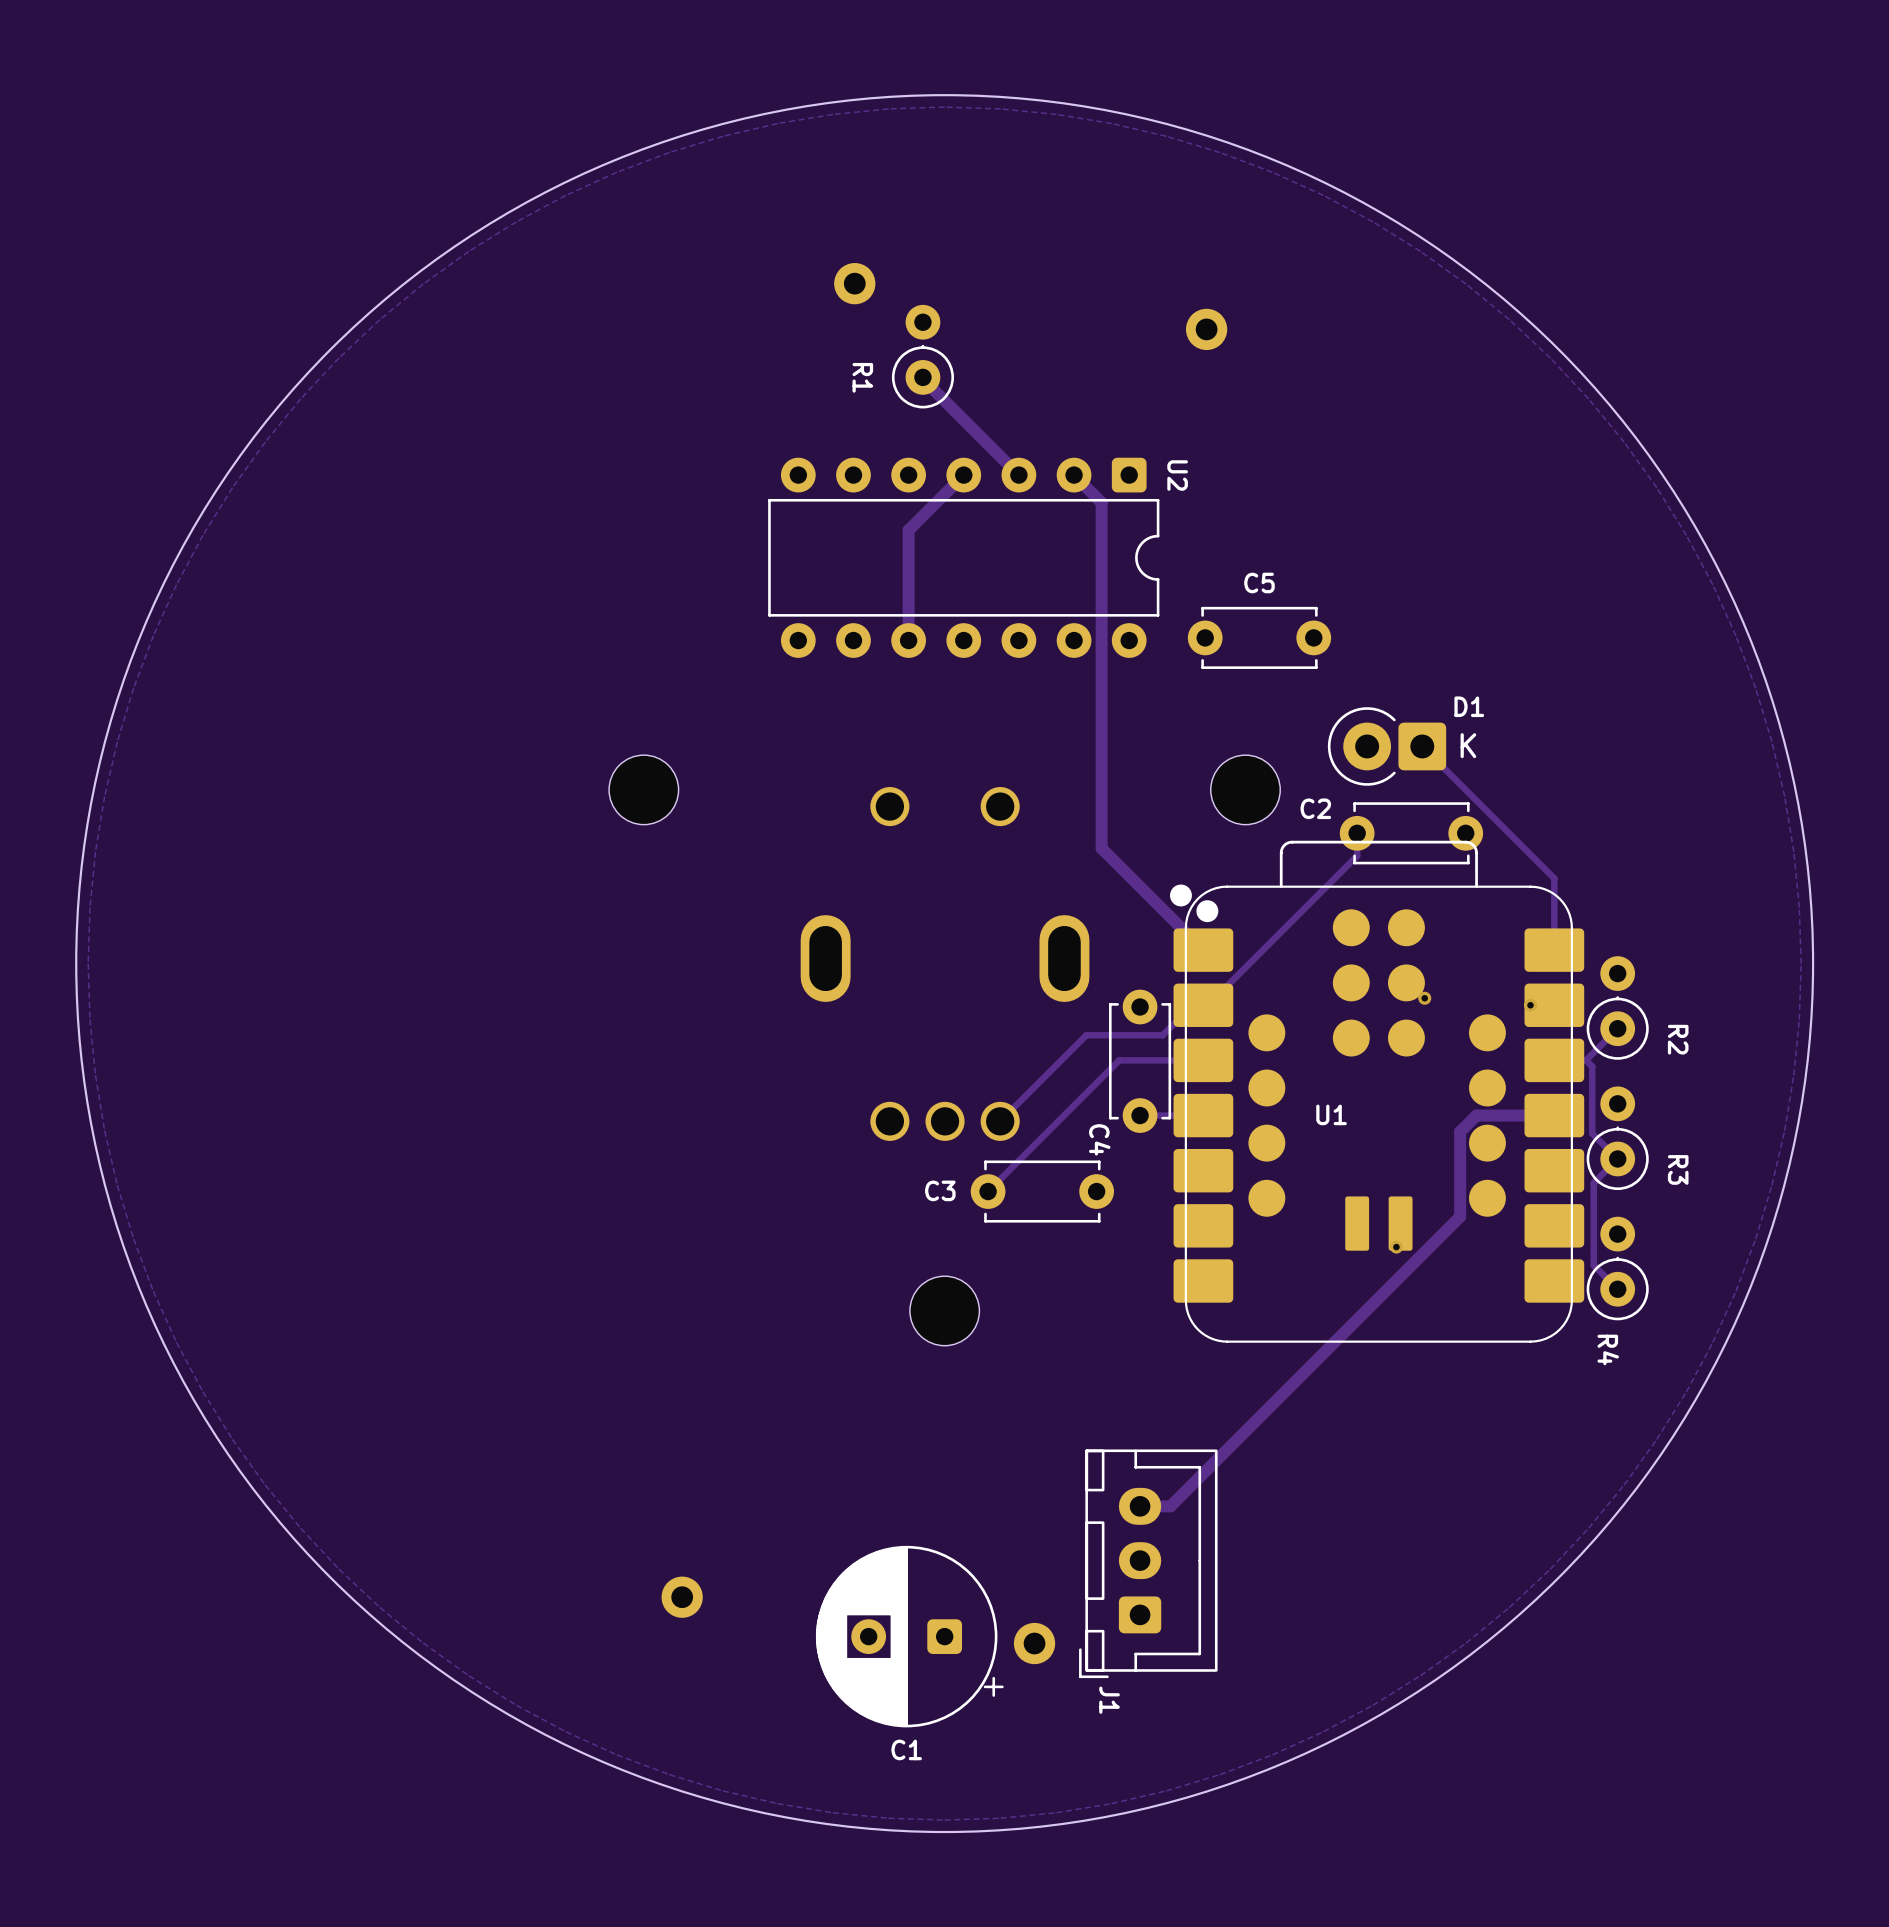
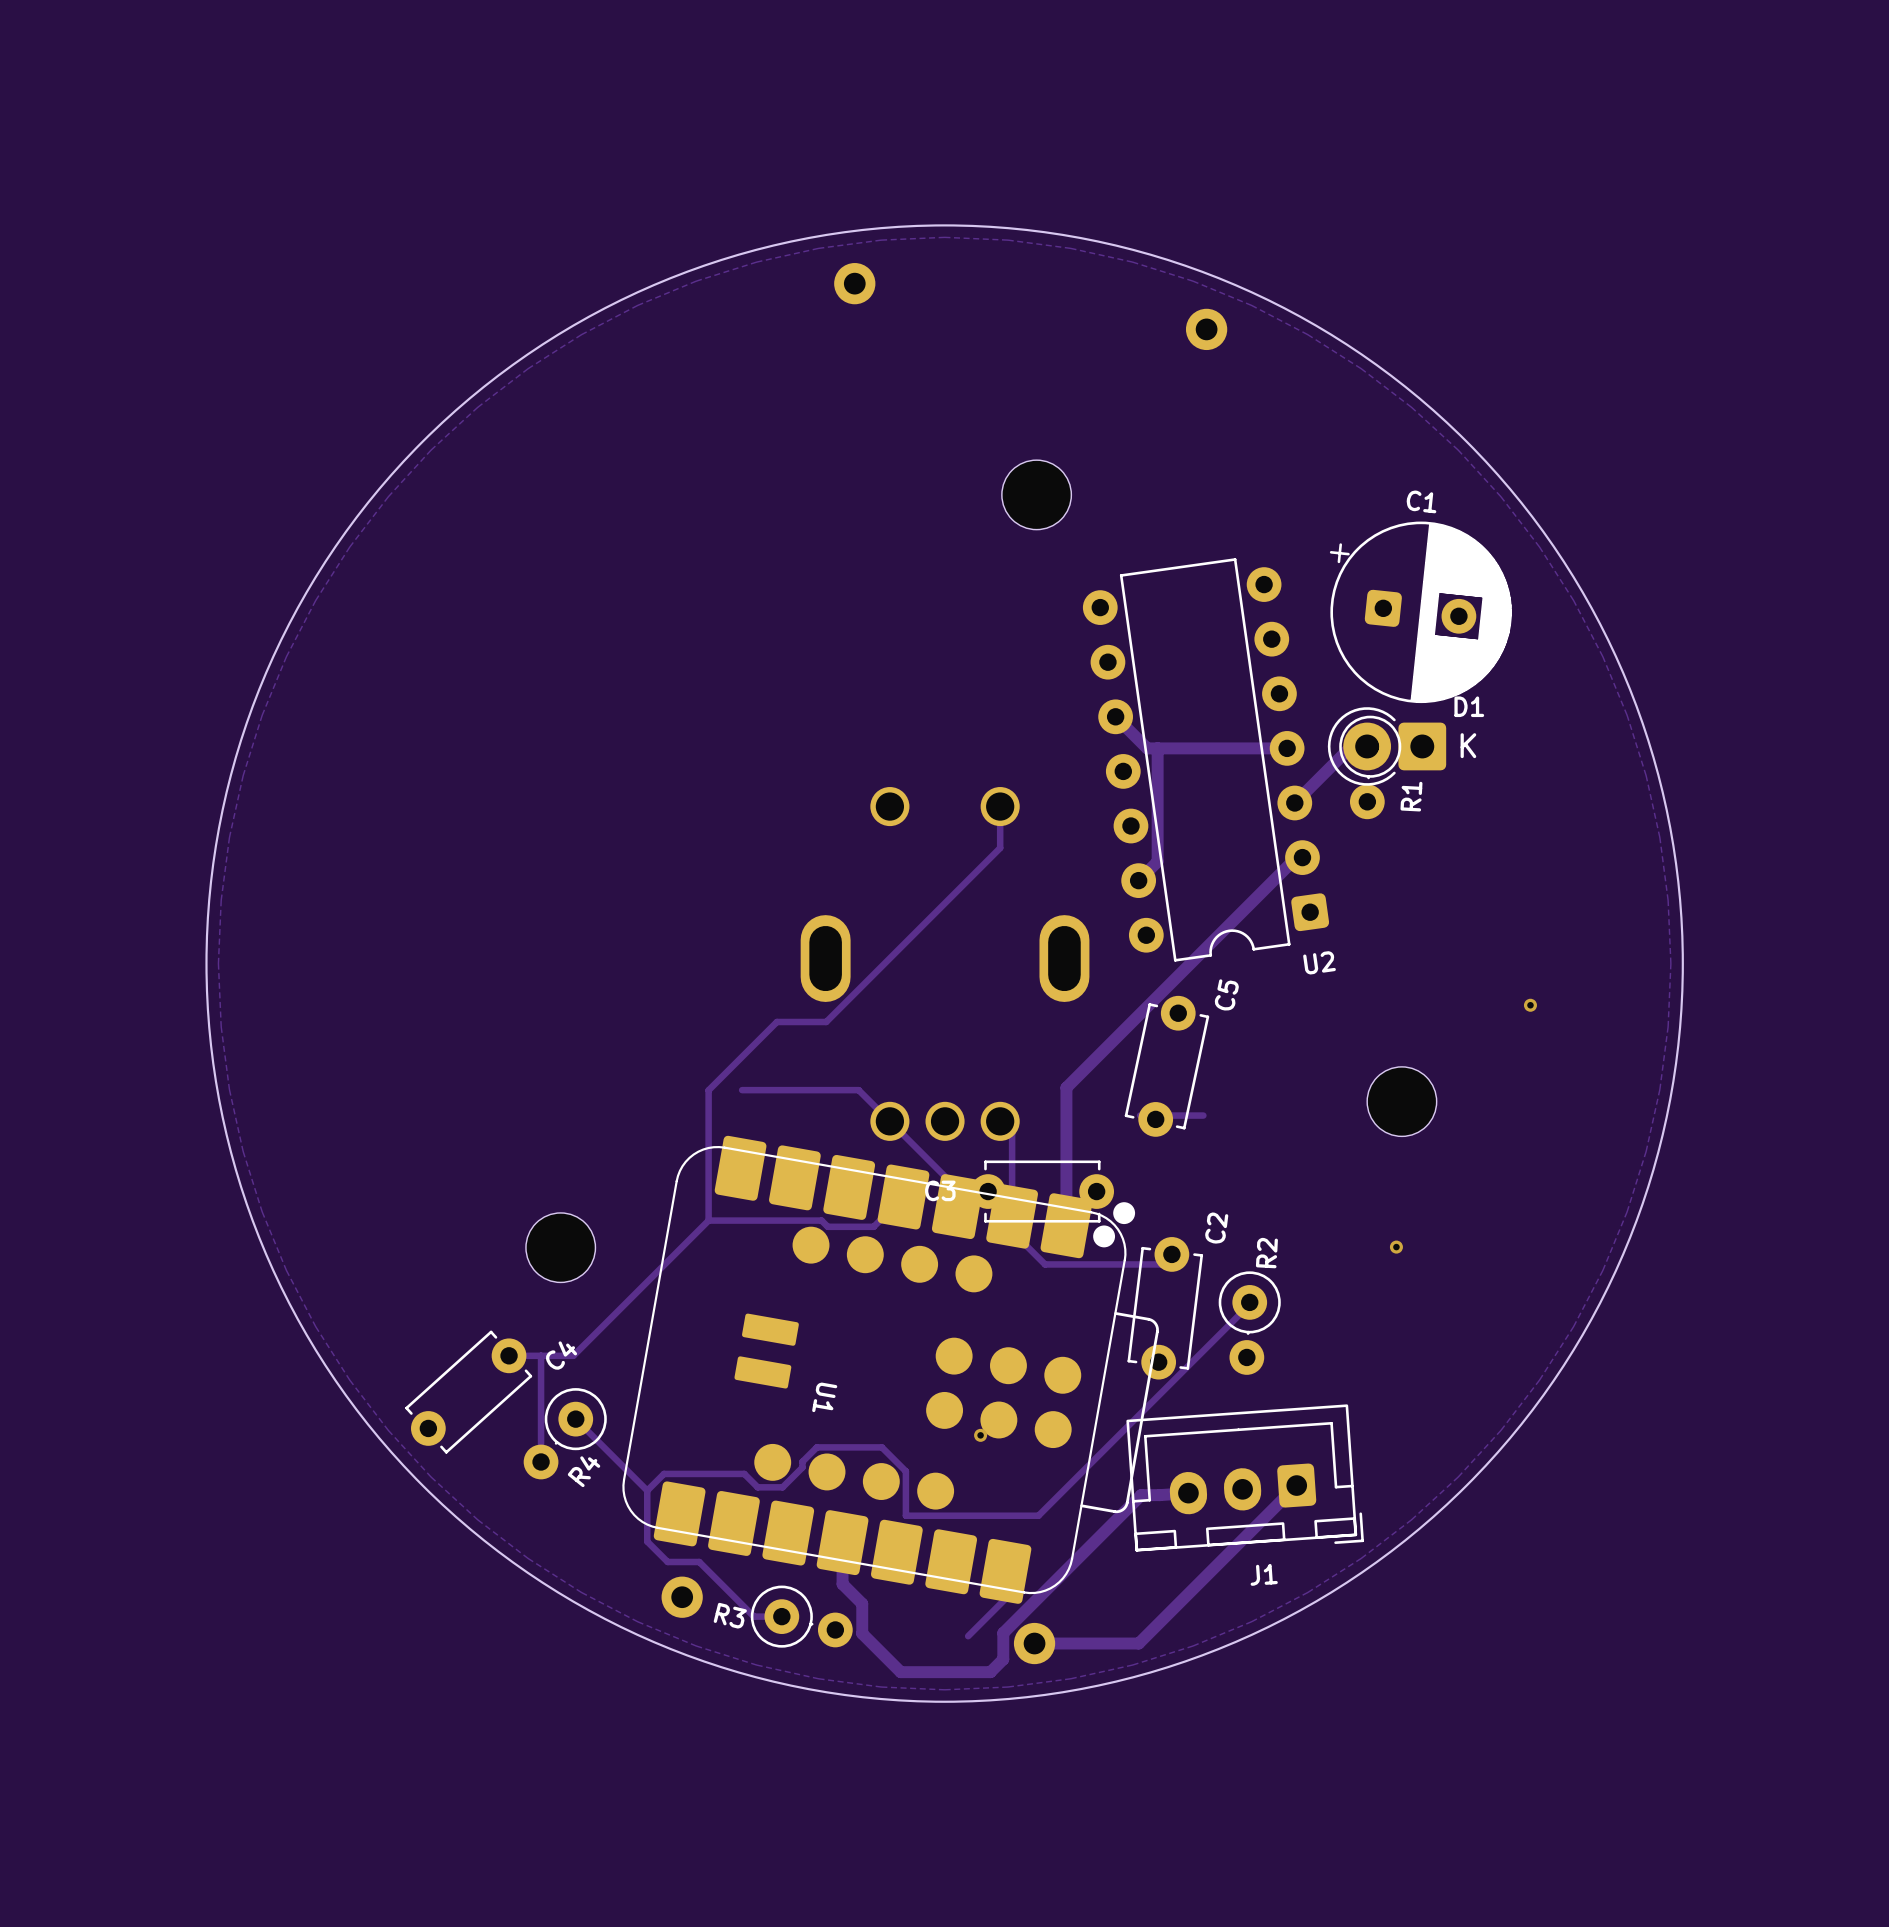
round board edge size: [75, 94, 1815, 1834] -> [205, 224, 1684, 1703]
zone outline: (944, 107) (1000, 108) (1056, 114) (1111, 123) (1166, 136) (1219, 152) (1272, 172) (1323, 195) (1372, 221) (1420, 251) (1466, 284) (1509, 319) (1550, 357) (1588, 398) (1624, 442) (1656, 487) (1686, 535) (1712, 584) (1735, 635) (1755, 688) (1771, 741) (1784, 796) (1793, 851) (1799, 907) (1801, 963) (1799, 1019) (1793, 1075) (1784, 1130) (1771, 1185) (1755, 1238) (1735, 1291) (1712, 1342) (1686, 1391) (1656, 1439) (1624, 1484) (1588, 1528) (1550, 1569) (1509, 1607) (1466, 1643) (1420, 1675) (1372, 1705) (1323, 1731) (1272, 1754) (1219, 1774) (1166, 1790) (1111, 1803) (1056, 1812) (1000, 1818) (944, 1820) (888, 1818) (832, 1812) (777, 1803) (722, 1790) (669, 1774) (616, 1754) (565, 1731) (516, 1705) (468, 1675) (423, 1643) (379, 1607) (339, 1569) (300, 1528) (265, 1484) (232, 1439) (202, 1391) (176, 1342) (153, 1291) (133, 1238) (117, 1185) (104, 1130) (95, 1075) (90, 1019) (88, 963) (90, 907) (95, 851) (104, 796) (117, 741) (133, 688) (153, 635) (176, 584) (202, 535) (232, 487) (265, 442) (300, 398) (339, 357) (379, 319) (423, 284) (468, 251) (516, 221) (565, 195) (616, 172) (669, 152) (722, 136) (777, 123) (832, 114) (888, 108) (944, 107) -> (944, 237) (1007, 240) (1070, 248) (1132, 262) (1193, 281) (1251, 305) (1307, 334) (1361, 368) (1411, 407) (1458, 450) (1500, 496) (1539, 547) (1573, 600) (1602, 656) (1627, 715) (1646, 775) (1659, 837) (1668, 900) (1670, 963) (1668, 1026) (1659, 1089) (1646, 1151) (1627, 1211) (1602, 1270) (1573, 1326) (1539, 1380) (1500, 1430) (1458, 1477) (1411, 1519) (1361, 1558) (1307, 1592) (1251, 1621) (1193, 1646) (1132, 1665) (1070, 1678) (1007, 1687) (944, 1689) (881, 1687) (818, 1678) (756, 1665) (696, 1646) (637, 1621) (581, 1592) (528, 1558) (477, 1519) (431, 1477) (388, 1430) (349, 1380) (315, 1326) (286, 1270) (262, 1211) (243, 1151) (229, 1089) (221, 1026) (218, 963) (221, 900) (229, 837) (243, 775) (262, 715) (286, 656) (315, 600) (349, 547) (388, 496) (431, 450) (477, 407) (528, 368) (581, 334) (637, 305) (696, 281) (756, 262) (818, 248) (881, 240) (944, 237)
R1 rotation: 0° (922, 356) -> 177° counterclockwise (1370, 767)
R1 position: (922, 356) -> (1370, 767)
R1 name position: R1 (862, 377) -> R1 (1411, 796)
track: (922, 377) (1018, 475) -> none
track: (963, 475) (908, 530) (908, 640) -> none
track: (1074, 475) (1101, 502) (1101, 848) (1203, 950) -> none
part: none -> (1036, 494)
U2 rotation: 0° (963, 557) -> 82° clockwise (1205, 759)
U2 position: (963, 557) -> (1205, 759)
C5 name position: C5 (1259, 582) -> C5 (1226, 994)
C5 rotation: 0° (1259, 637) -> 78° counterclockwise (1166, 1066)
C5 position: (1259, 637) -> (1166, 1066)
track: none -> (1115, 716) (1147, 748) (1287, 748)
track: none -> (1370, 746) (1351, 746) (1294, 803)
track: (1422, 746) (1554, 878) (1554, 950) -> none
track: none -> (1157, 748) (1157, 861) (1138, 880)
part: (643, 789) -> none
part: (1245, 789) -> none
track: none -> (1000, 806) (1000, 848) (826, 1021) (776, 1021) (708, 1090) (708, 1220)
C2 name position: C2 (1315, 808) -> C2 (1216, 1228)
track: (1357, 833) (1357, 855) (1207, 1005) (1192, 1005) (1162, 1035) (1086, 1035) (1000, 1121) -> (1171, 1254) (1161, 1264) (1045, 1264) (1012, 1231) (1012, 1133) (1000, 1121)
C2 rotation: 0° (1411, 833) -> 83° counterclockwise (1165, 1308)
C2 position: (1411, 833) -> (1165, 1308)
U1 footprint: [1170, 840, 1585, 1343] -> [622, 1135, 1159, 1604]
track: none -> (1302, 857) (1296, 857) (1066, 1087) (1066, 1225)
via: (1424, 998) -> none
R2 rotation: 0° (1617, 1007) -> 177° counterclockwise (1249, 1323)
R2 position: (1617, 1007) -> (1249, 1323)
track: (1617, 1028) (1585, 1060) -> none
R2 name position: R2 (1678, 1039) -> R2 (1266, 1253)
track: (1203, 1060) (1119, 1060) (988, 1191) -> none
track: (1585, 1060) (1592, 1066) (1592, 1133) (1617, 1158) (1593, 1182) (1593, 1265) (1617, 1289) -> none
C4 rotation: 0° (1140, 1061) -> 48° clockwise (468, 1392)
C4 position: (1140, 1061) -> (468, 1392)
track: none -> (742, 1090) (858, 1090) (957, 1189) (957, 1206)
part: none -> (1401, 1101)
track: (1554, 1115) (1476, 1115) (1460, 1131) (1460, 1216) (1170, 1506) (1140, 1506) -> none
R3 rotation: 0° (1617, 1138) -> 104° clockwise (801, 1616)
R3 position: (1617, 1138) -> (801, 1616)
C4 name position: C4 (1099, 1139) -> C4 (561, 1355)
R3 name position: R3 (1678, 1169) -> R3 (730, 1615)
track: none -> (903, 1197) (873, 1226) (827, 1226) (821, 1220) (708, 1220)
track: none -> (708, 1220) (573, 1355) (509, 1355)
part: none -> (560, 1247)
R4 rotation: 0° (1617, 1268) -> 141° counterclockwise (565, 1433)
R4 position: (1617, 1268) -> (565, 1433)
track: none -> (1249, 1302) (1038, 1515) (905, 1515) (905, 1471) (881, 1447) (816, 1447) (802, 1461) (802, 1467) (782, 1487) (757, 1487) (744, 1473) (663, 1473) (647, 1490)
part: (944, 1310) -> none
R4 name position: R4 (1608, 1349) -> R4 (584, 1471)
track: none -> (541, 1355) (541, 1461)
track: none -> (575, 1419) (647, 1490)
via: none -> (980, 1435)
track: none -> (1296, 1485) (1138, 1643) (1034, 1643)
track: none -> (647, 1490) (647, 1541) (667, 1561) (699, 1561) (753, 1616) (781, 1616)
track: none -> (1188, 1493) (1141, 1495) (1003, 1633) (1003, 1659) (990, 1672) (900, 1672) (862, 1633) (862, 1603) (842, 1584) (842, 1542)
J1 rotation: 0° (1148, 1563) -> 94° counterclockwise (1245, 1477)
track: none -> (1005, 1571) (1005, 1598) (968, 1636)
C1 rotation: 0° (909, 1636) -> 174° counterclockwise (1420, 612)
C1 position: (909, 1636) -> (1420, 612)
J1 name position: J1 (1109, 1700) -> J1 (1264, 1574)

